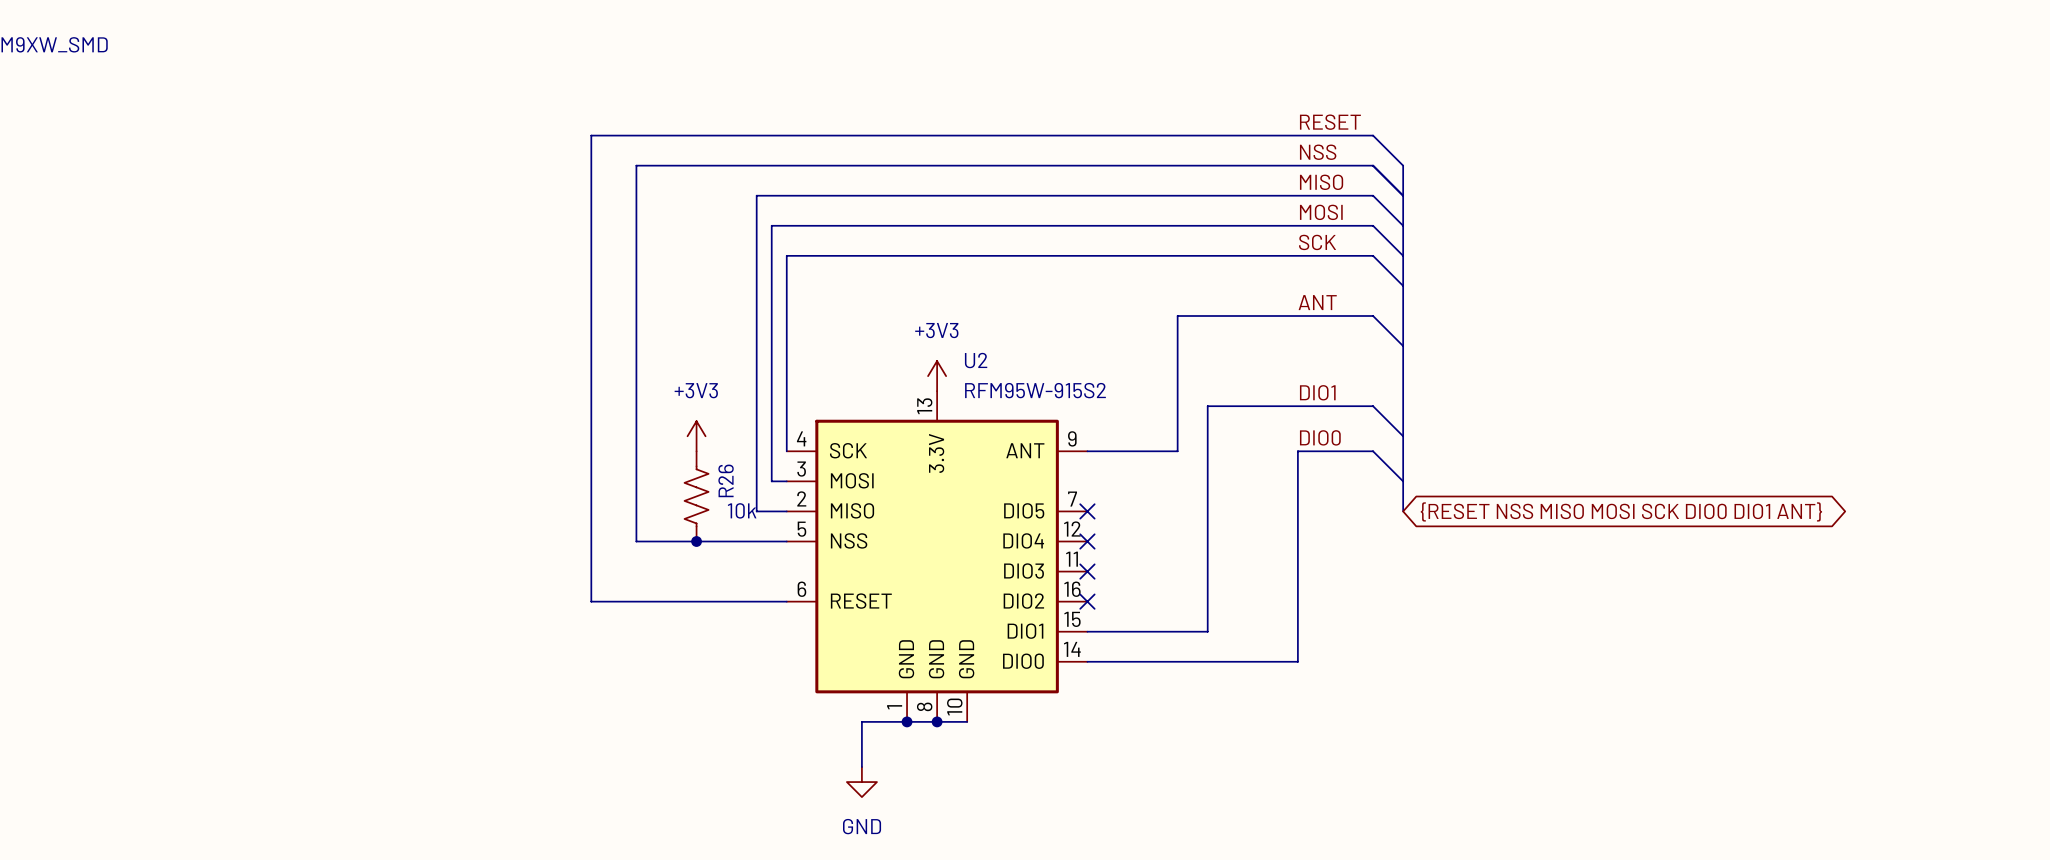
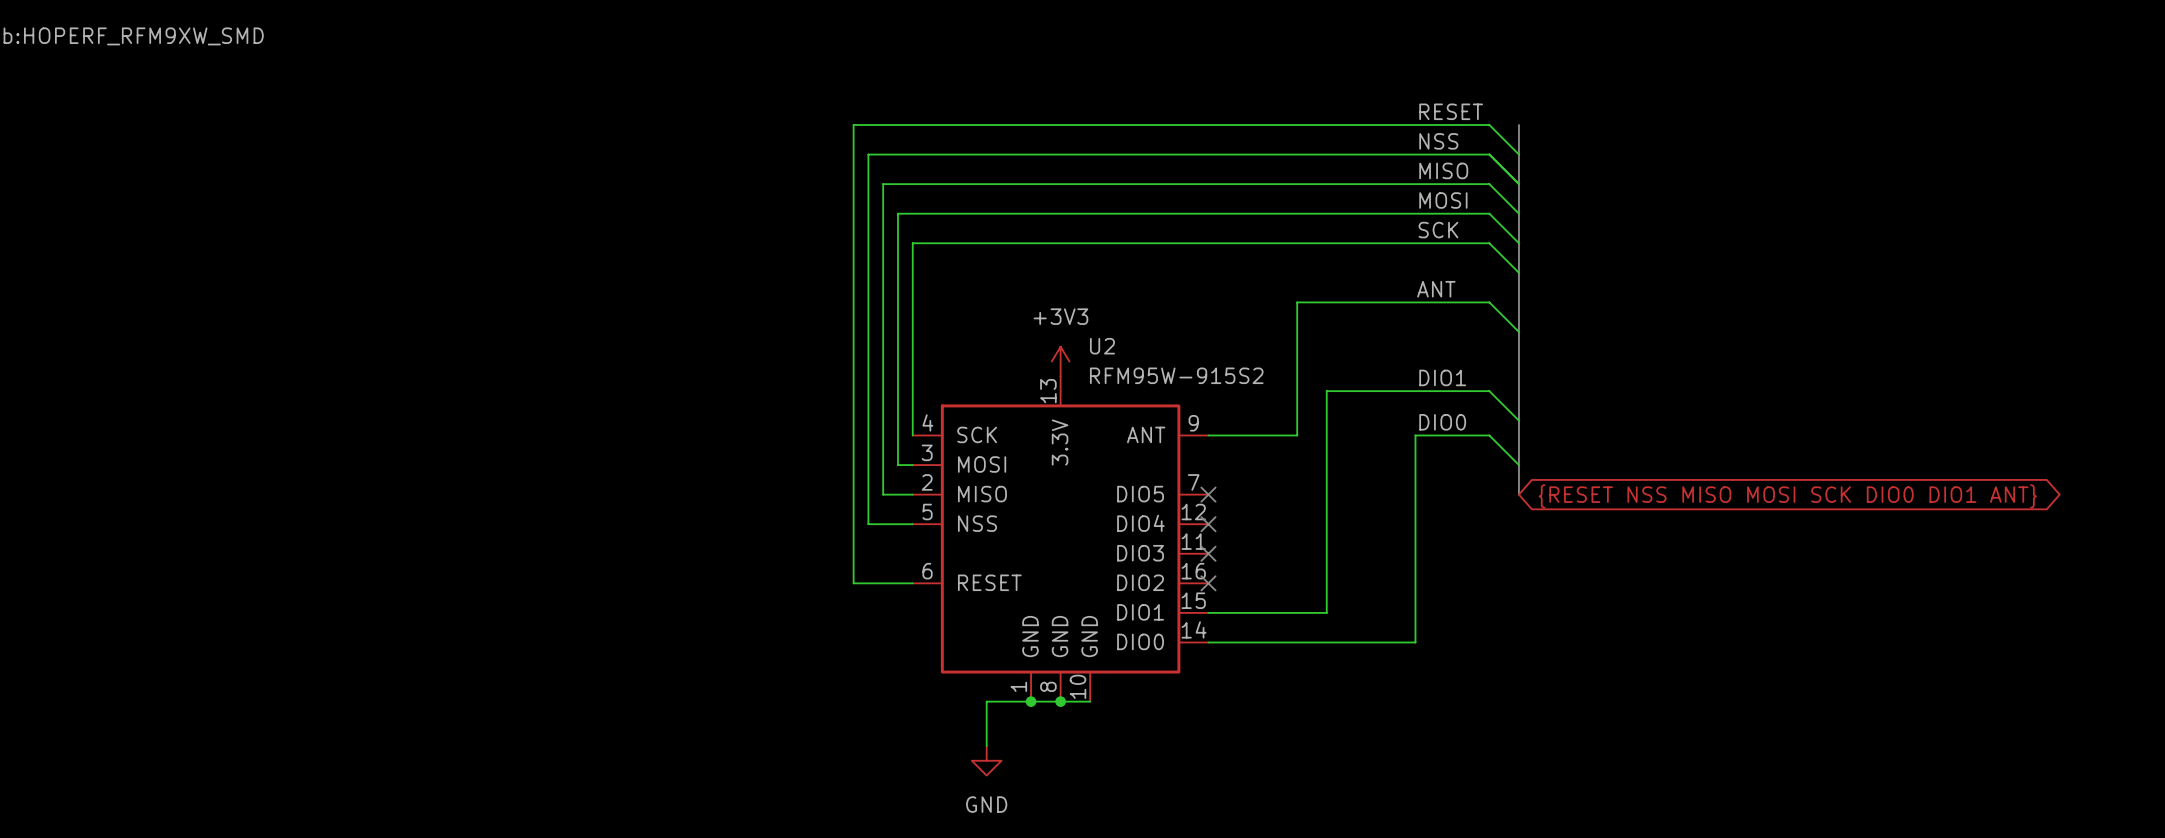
wire: (726, 135) (591, 135) (591, 601) (726, 601) -> (853, 124) (853, 583)
bus: none -> (1518, 124) (1518, 154)
wire: (741, 165) (636, 165) (636, 541) (741, 541) -> (868, 154) (868, 524)
power symbol: +3V3 (696, 436) -> none
R26: 10k (696, 496) -> none
junction: (696, 541) -> none

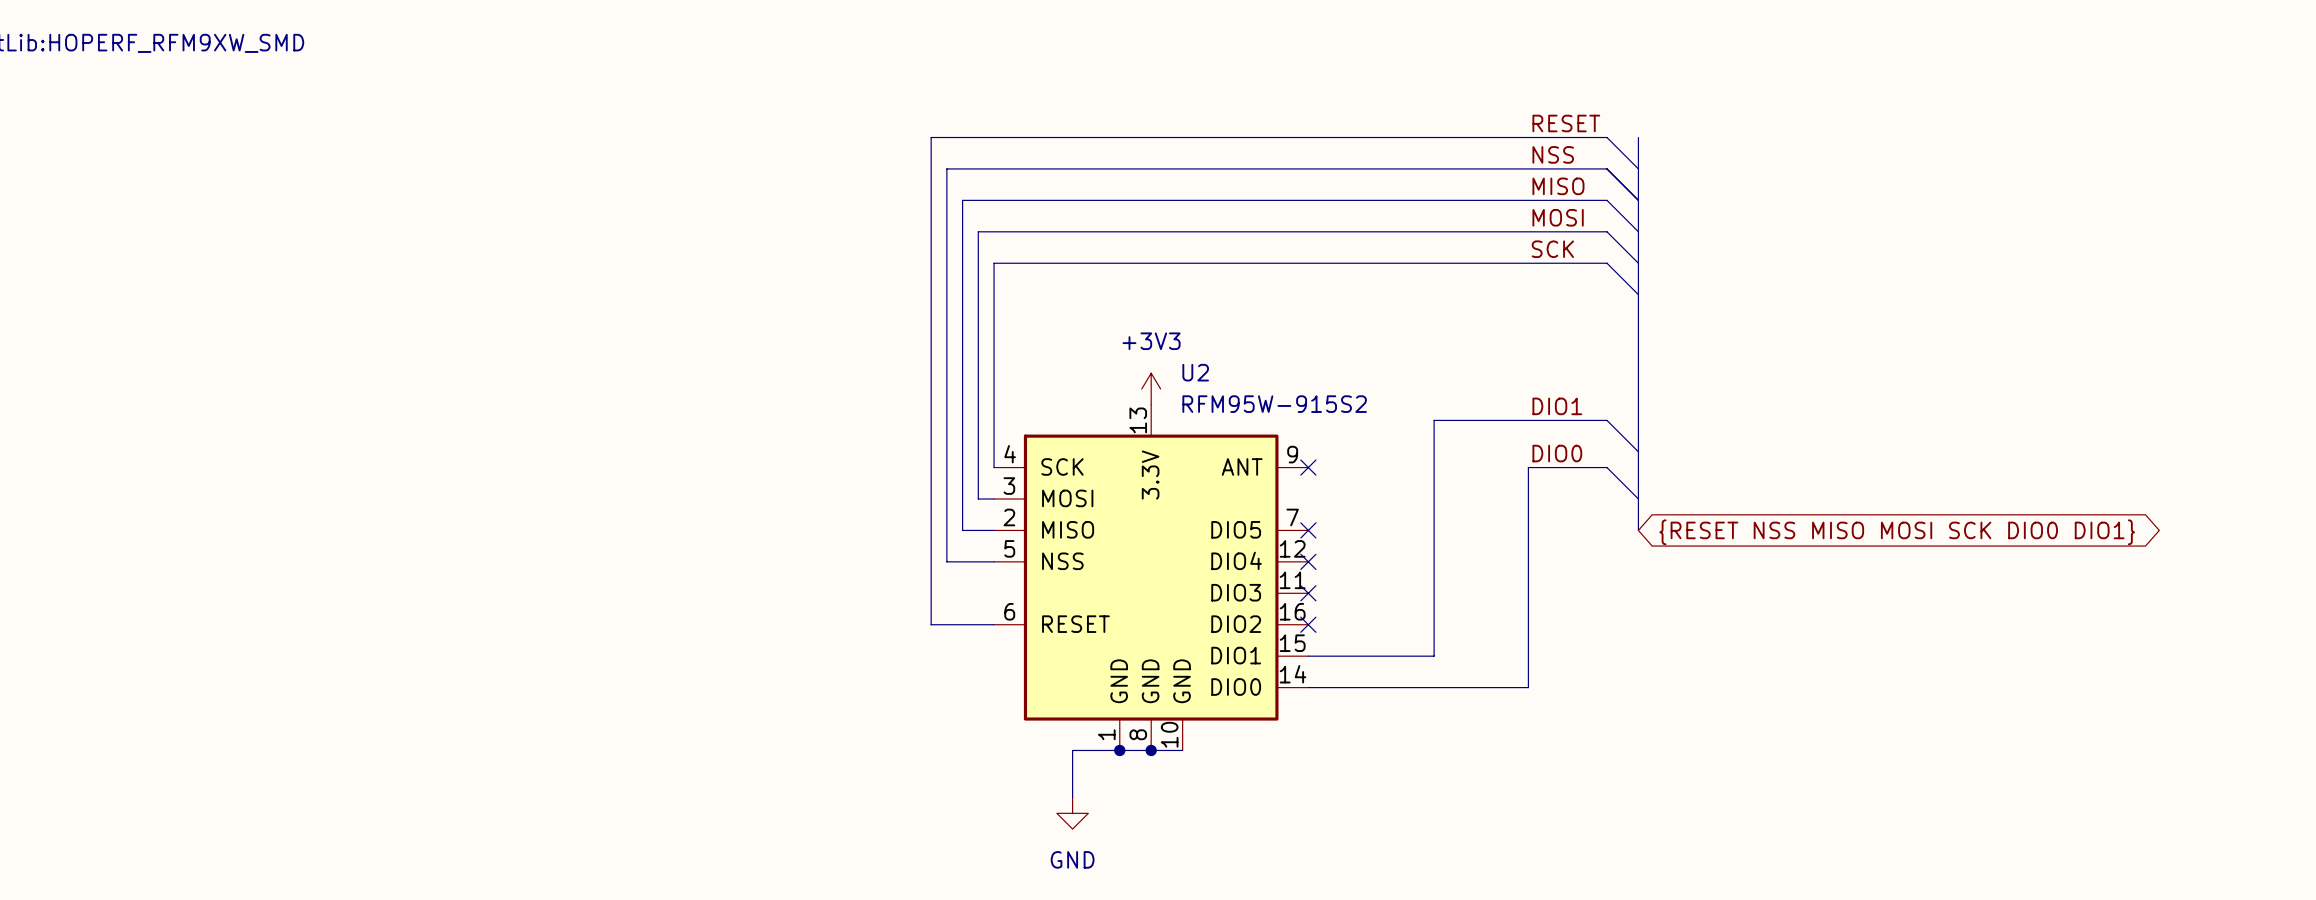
label: ANT (1436, 289) -> none
wire: (1518, 331) (1489, 302) (1297, 302) (1297, 435) (1208, 435) -> none
no-connect mark: none -> (1308, 467)
global label: {RESET NSS MISO MOSI SCK DIO0 DIO1 ANT} (1787, 496) -> {RESET NSS MISO MOSI SCK DIO0 DIO1} (1897, 532)

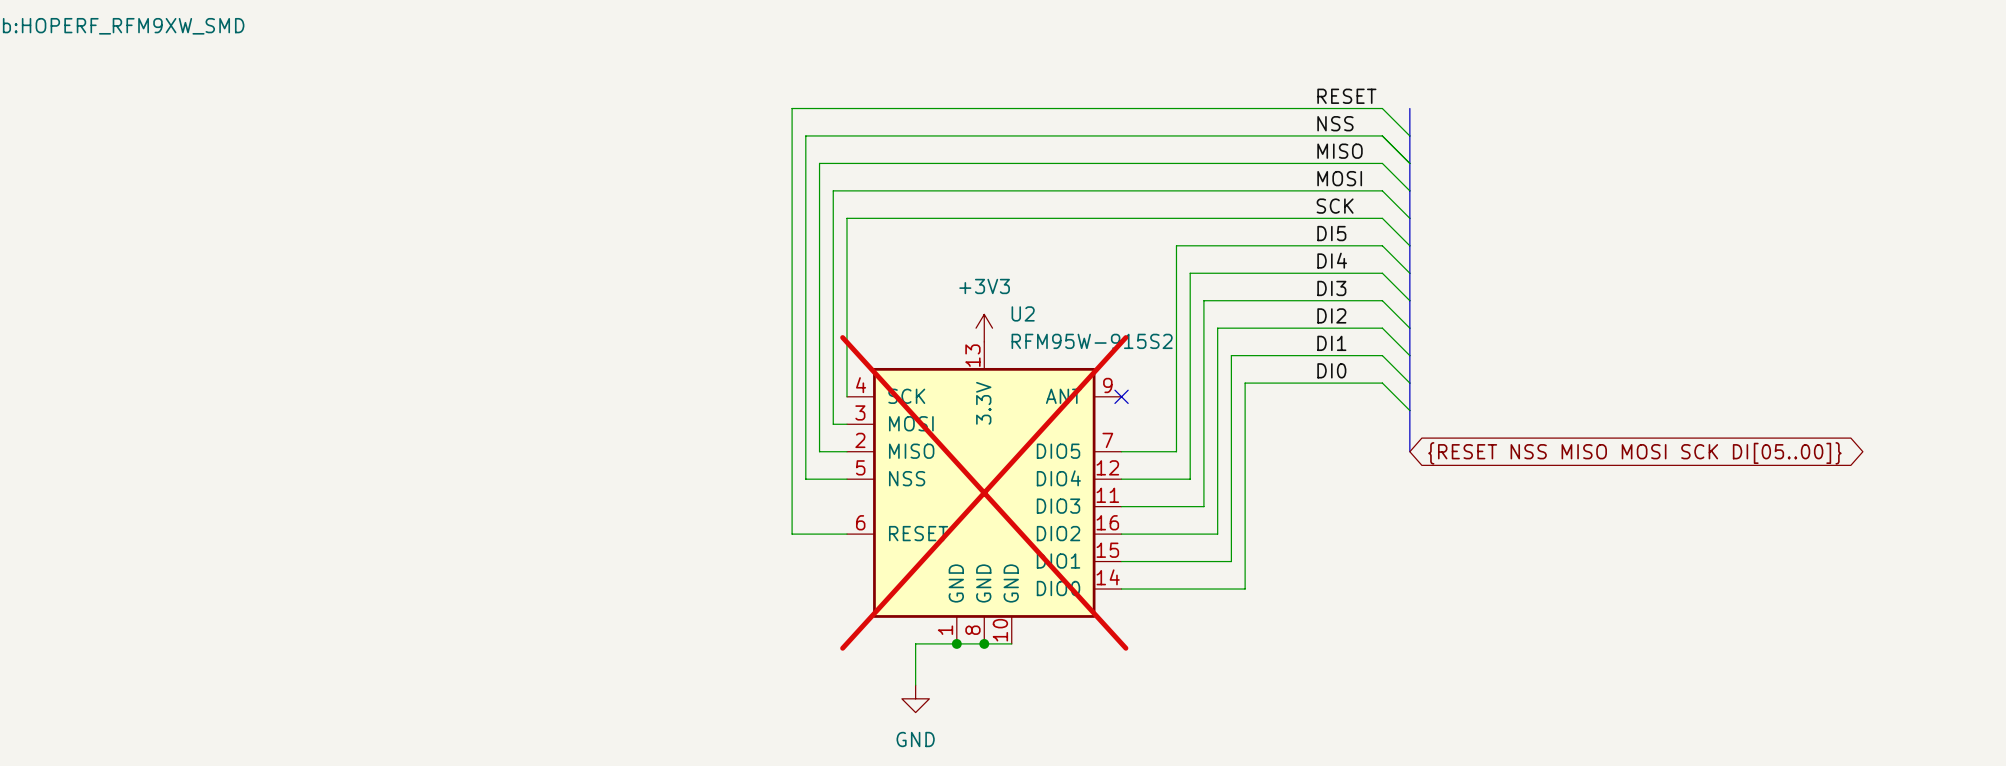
label: none -> DI5 (1331, 233)
label: none -> DI4 (1332, 260)
wire: none -> (1409, 273) (1382, 245) (1176, 245) (1176, 451) (1121, 451)
label: none -> DI3 (1331, 288)
wire: none -> (1409, 300) (1382, 273) (1190, 273) (1190, 479) (1121, 479)
label: none -> DI2 (1331, 315)
wire: none -> (1409, 328) (1382, 300) (1203, 300) (1203, 506) (1121, 506)
label: DIO1 (1557, 406) -> DI1 (1331, 343)
wire: none -> (1409, 355) (1382, 328) (1217, 328) (1217, 534) (1121, 534)
label: DIO0 (1557, 453) -> DI0 (1331, 370)
wire: (1638, 499) (1606, 467) (1528, 467) (1528, 687) (1449, 687) -> (1409, 410) (1382, 383) (1245, 383) (1245, 589)
no-connect mark: (1308, 530) -> none
global label: {RESET NSS MISO MOSI SCK DIO0 DIO1} (1897, 532) -> {RESET NSS MISO MOSI SCK DI[05..00]} (1634, 453)
no-connect mark: (1308, 561) -> none
U2 do-not-place cross: none -> (984, 492)
no-connect mark: (1308, 593) -> none
no-connect mark: (1308, 624) -> none

